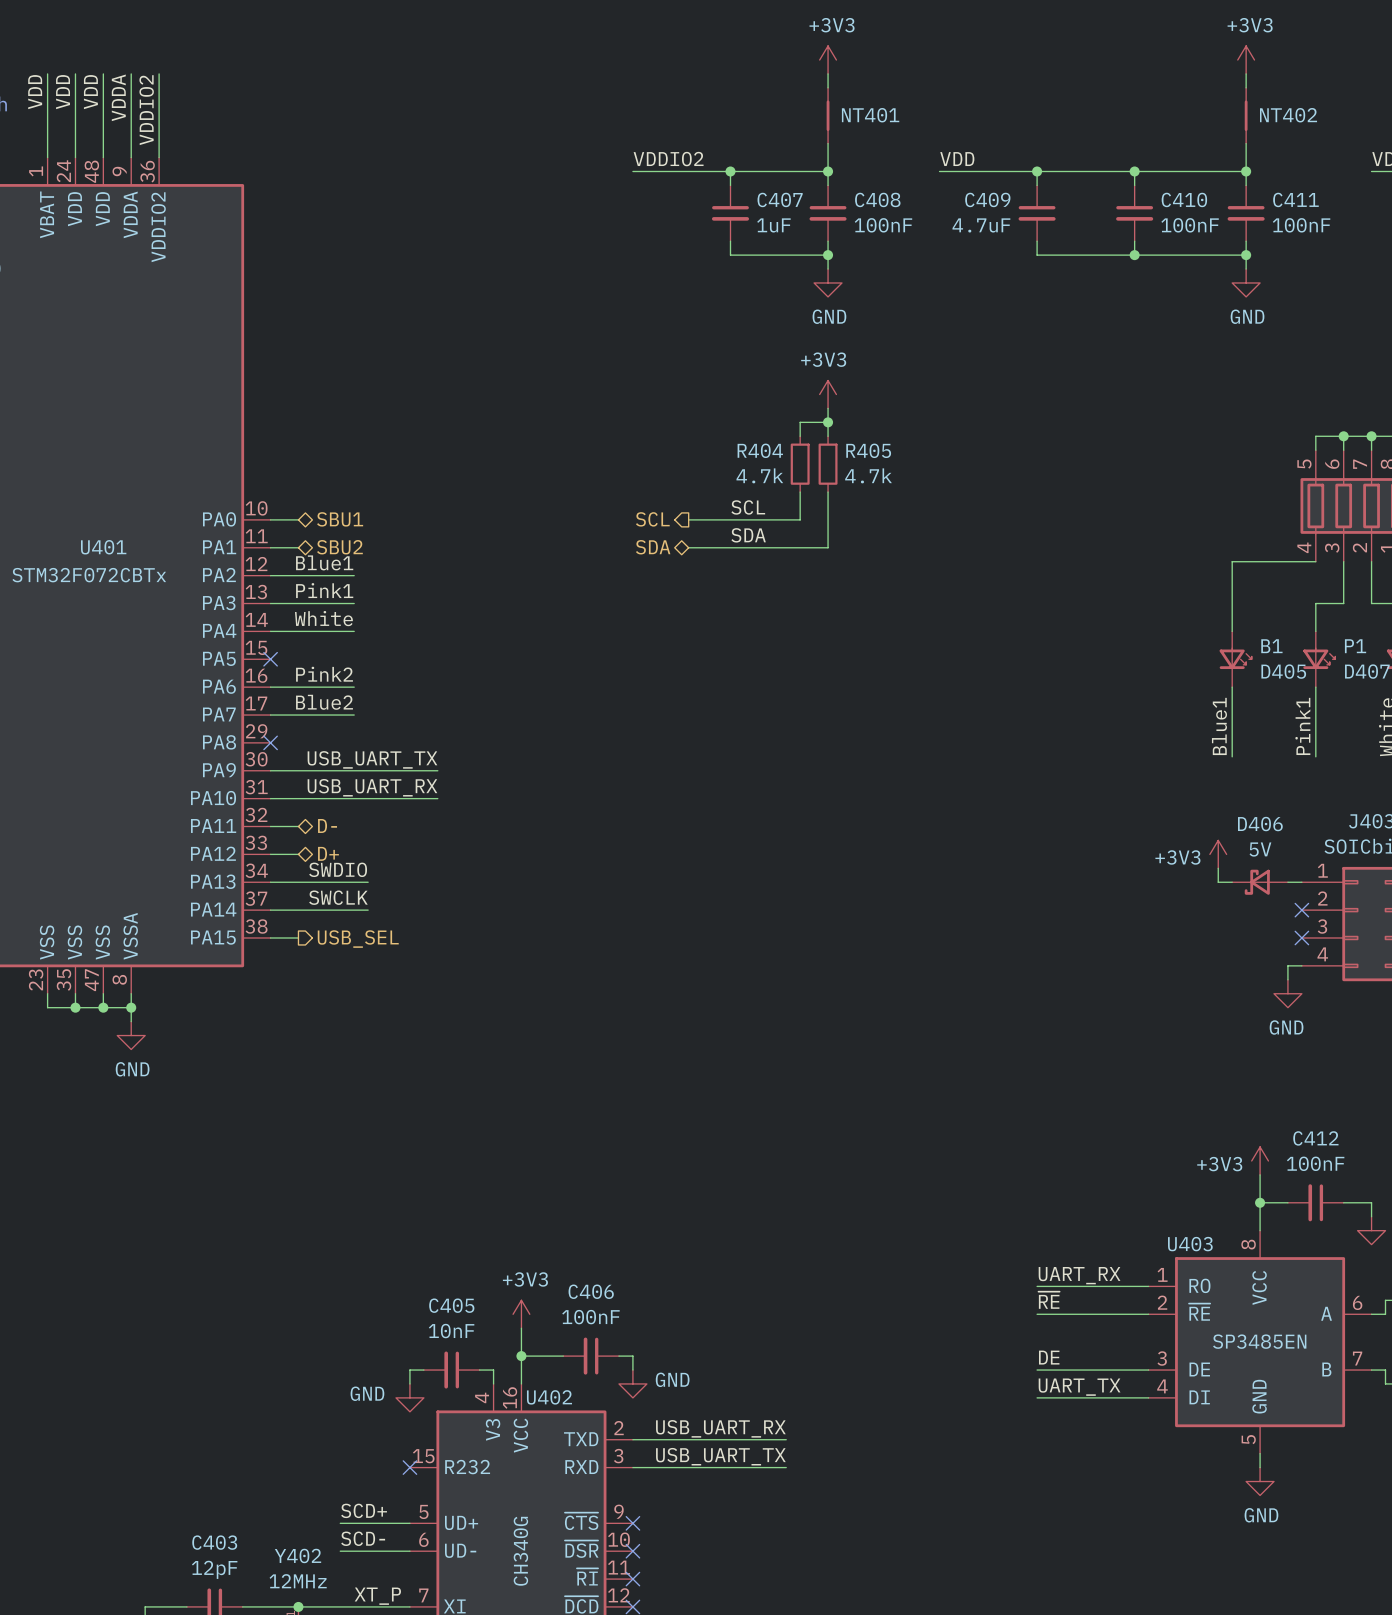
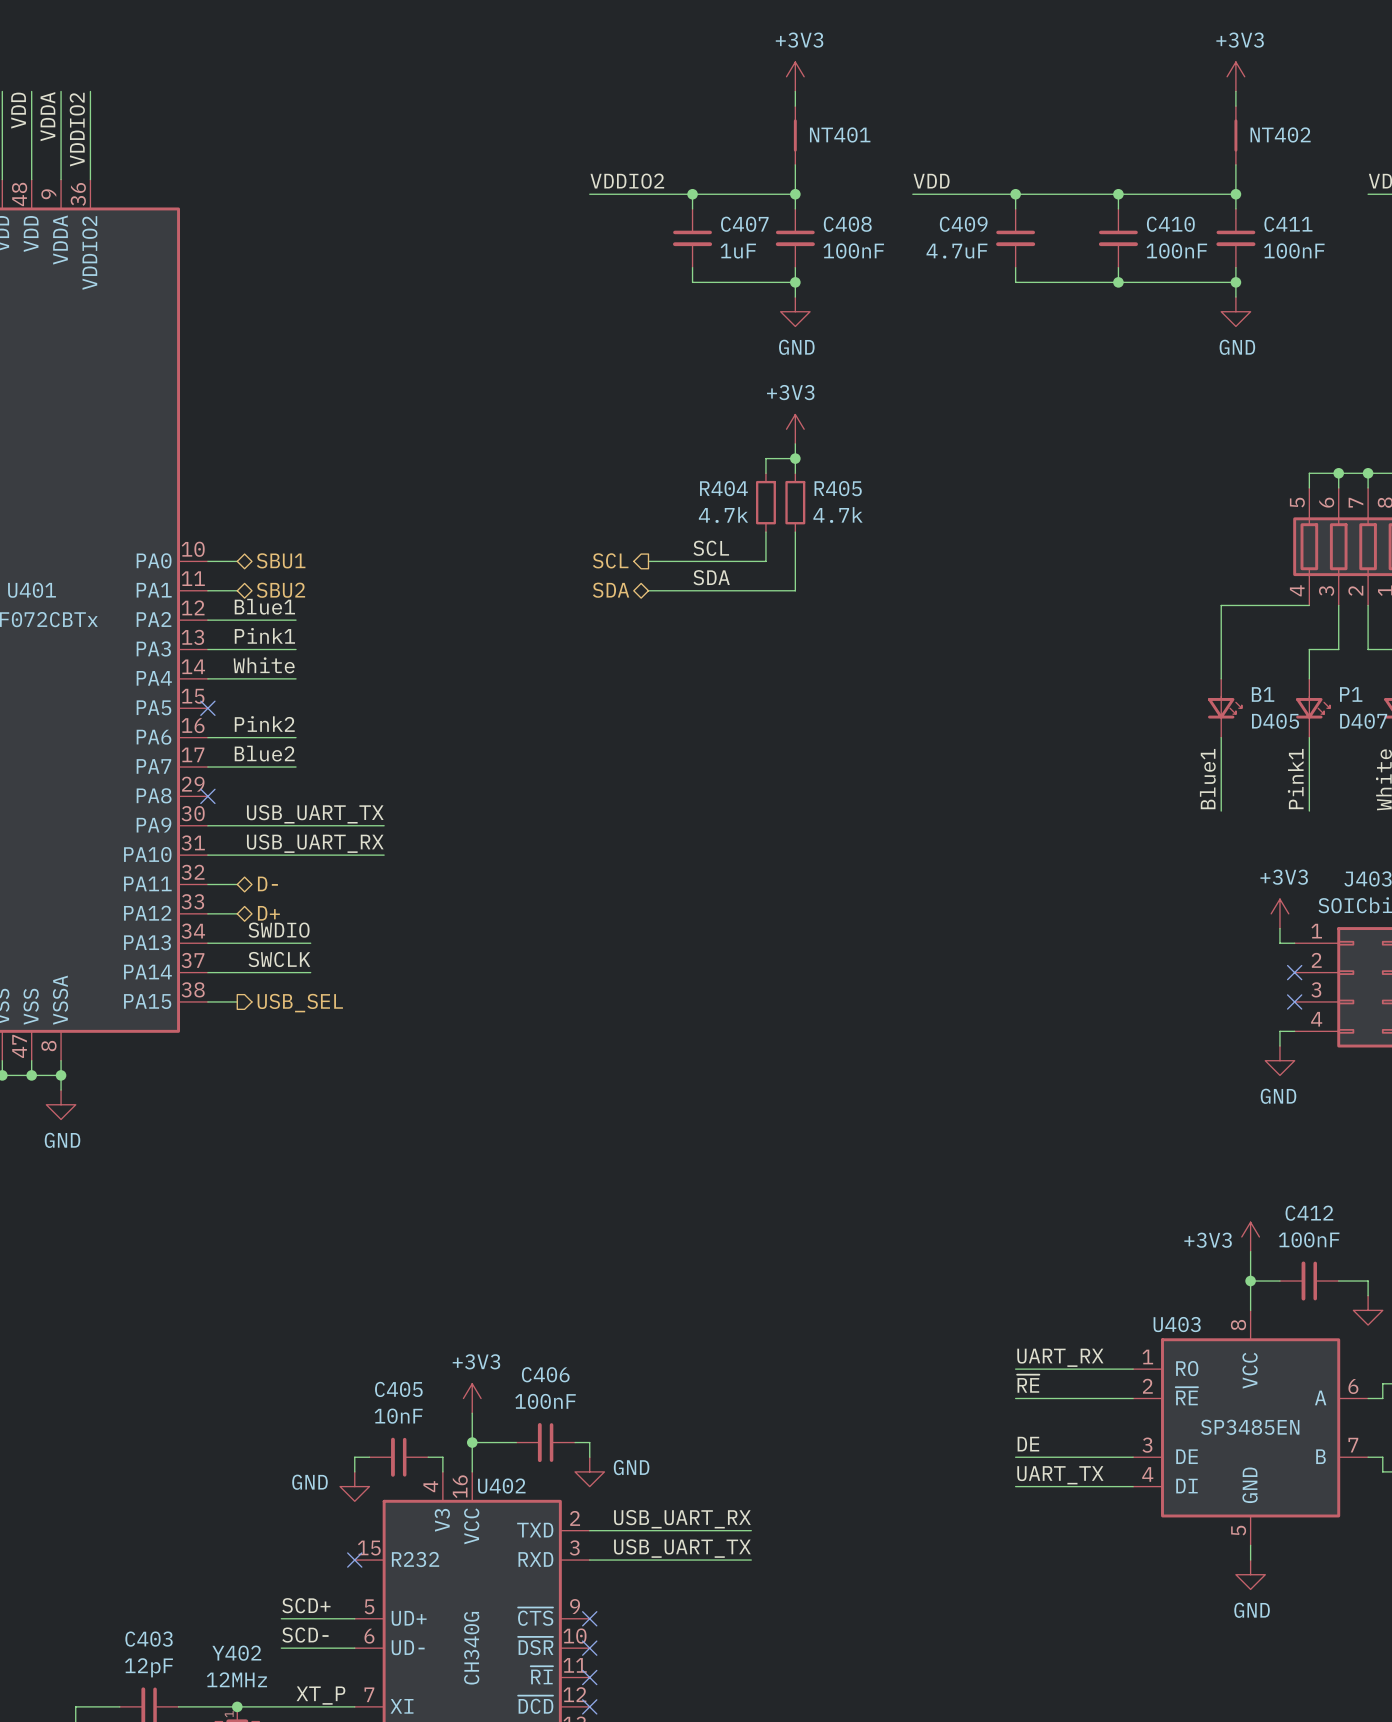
power symbol position: +3V3 (1218, 854) -> +3V3 (1279, 913)
power symbol text position: +3V3 (1177, 857) -> +3V3 (1284, 877)
wire: (1218, 868) (1218, 882) (1232, 882) -> none
wire: none -> (1279, 928) (1279, 943)
D406: 5V (1260, 882) -> none

